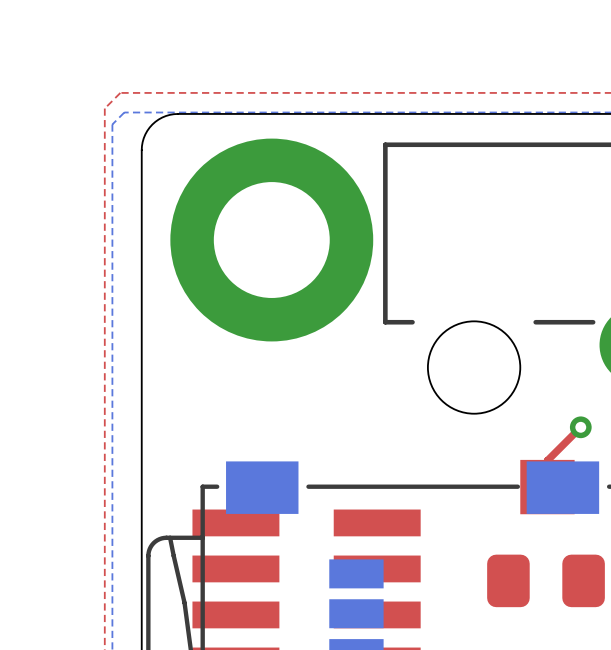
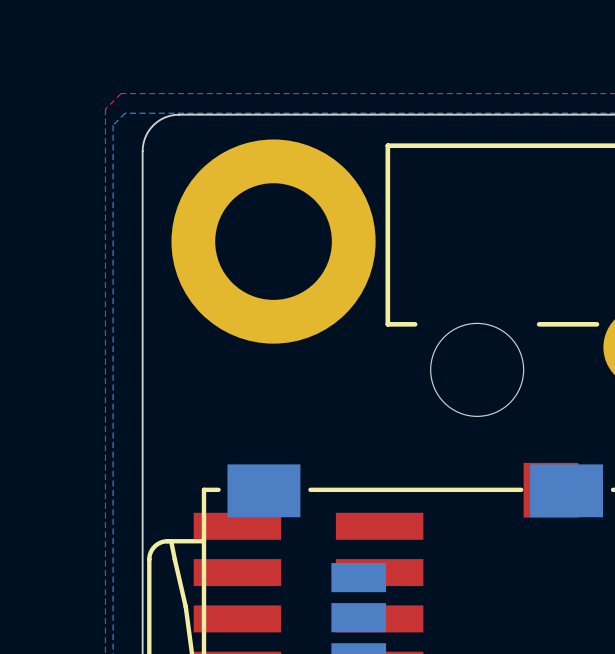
top track: (580, 427) (547, 460) (547, 487) (558, 476) -> none
via: (580, 427) -> none
part: (546, 580) -> none

